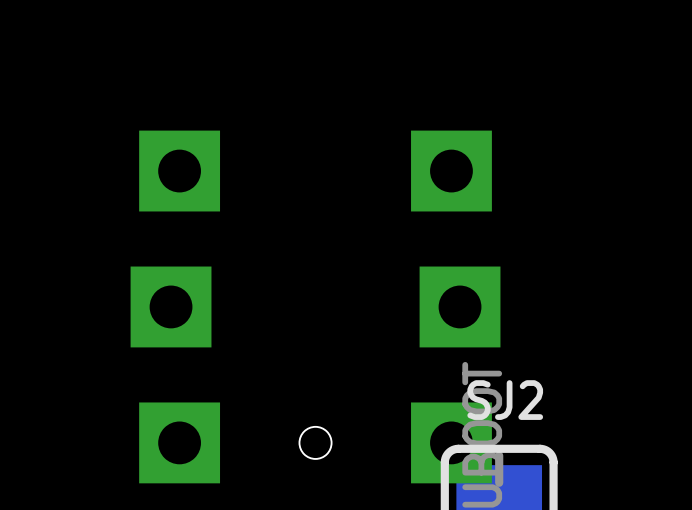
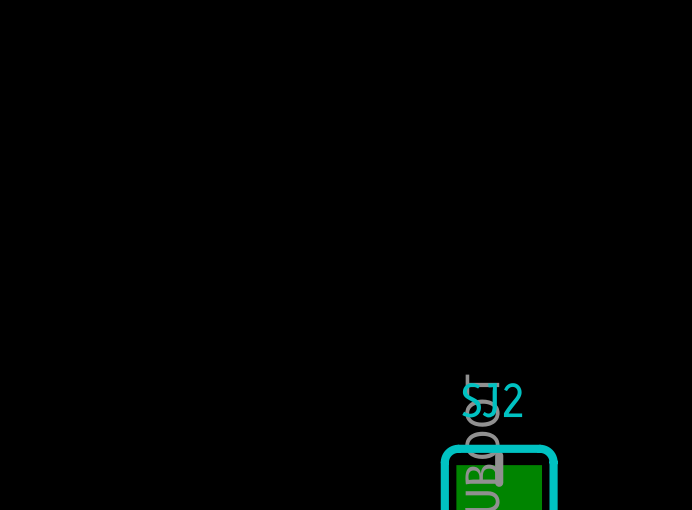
part: (315, 306) -> none

